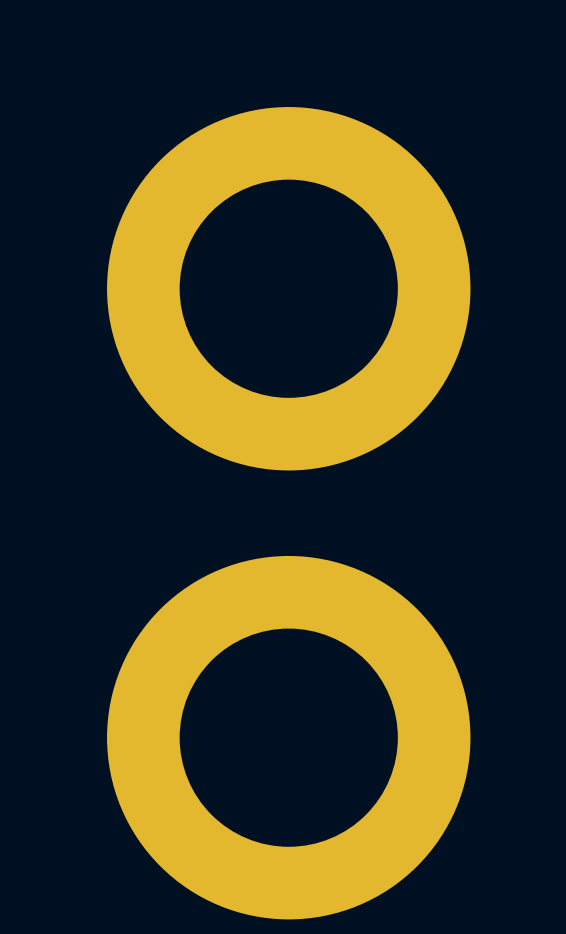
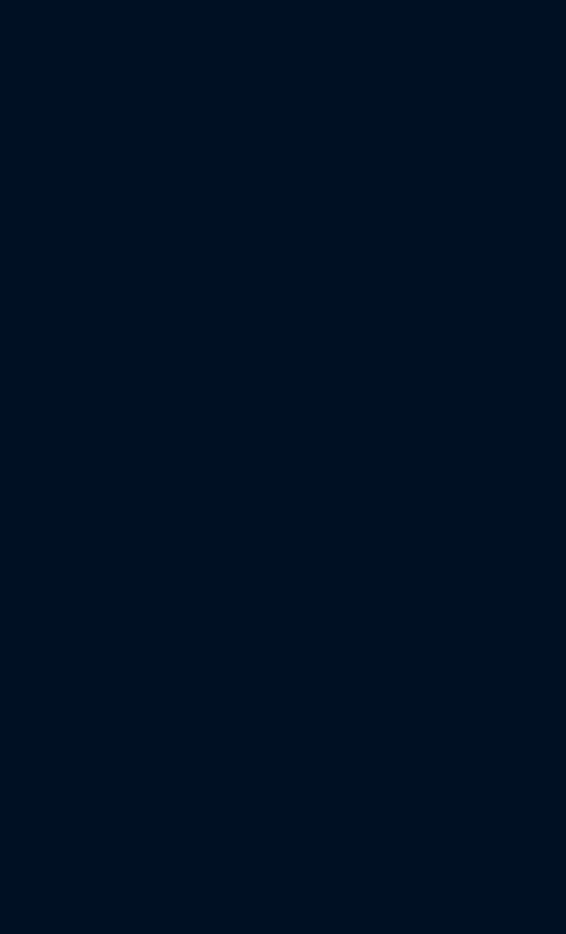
part: (288, 288) -> none
part: (288, 737) -> none

